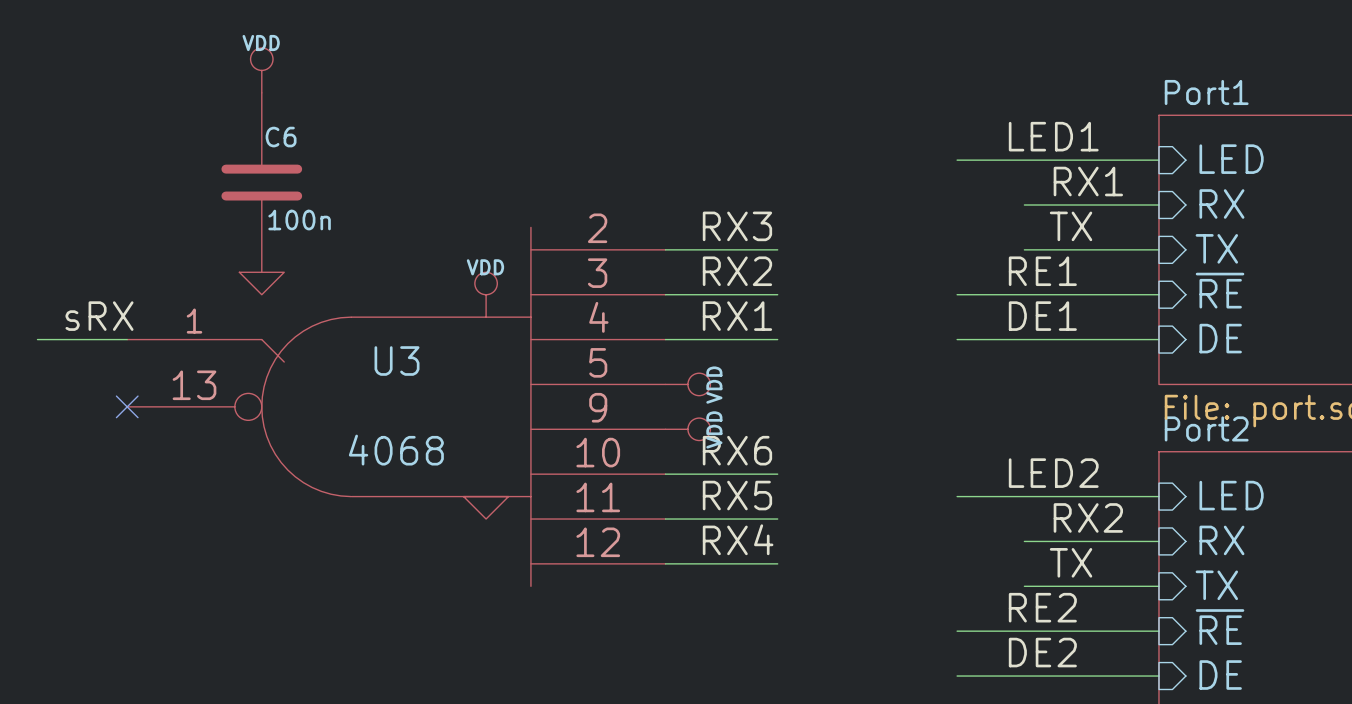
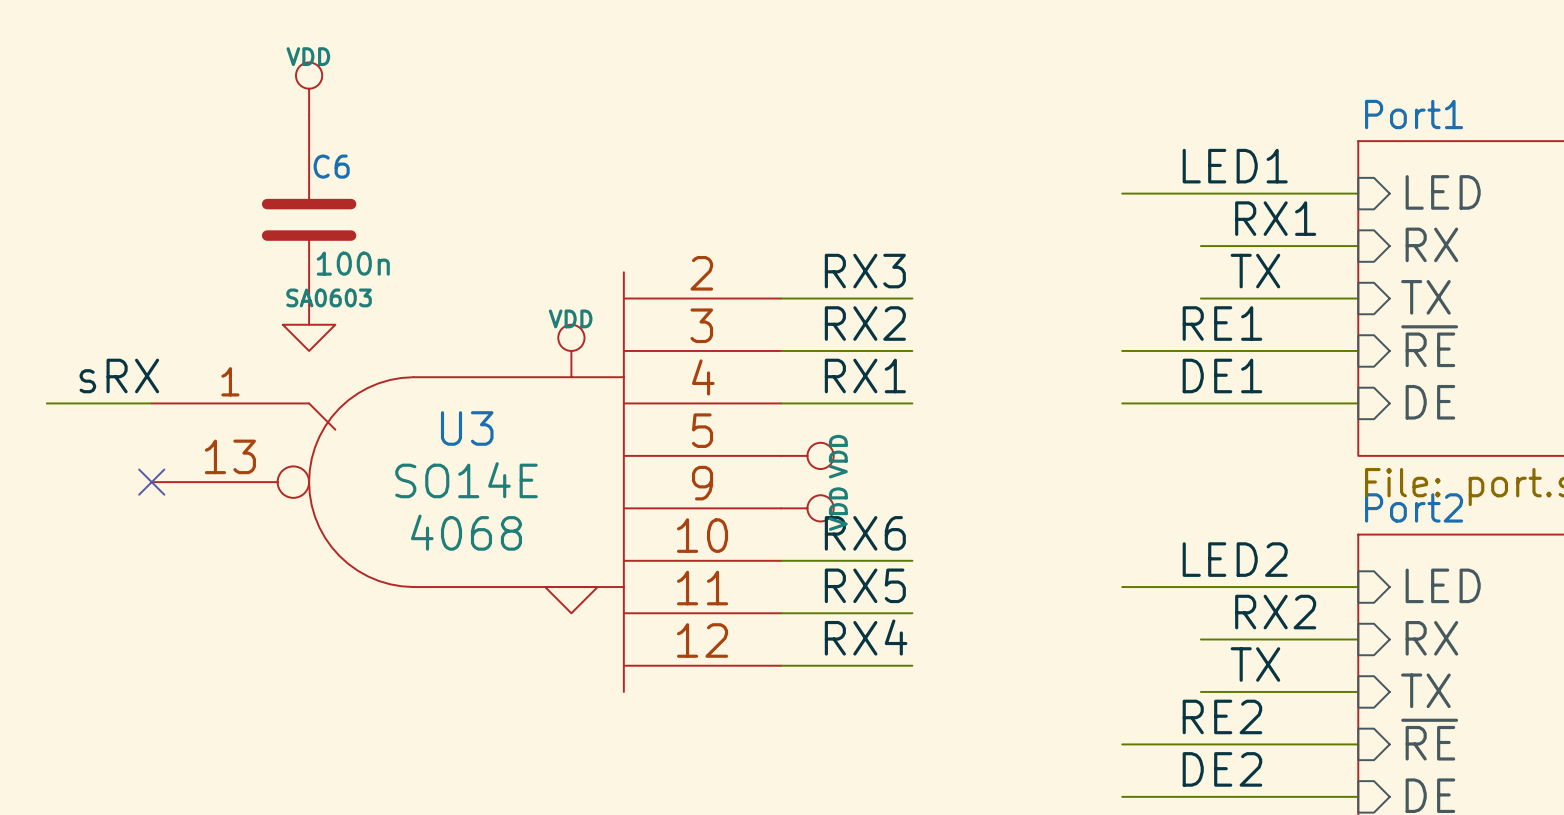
C6 text: none -> SA0603 (329, 297)
U3 text: none -> SO14E (466, 480)

